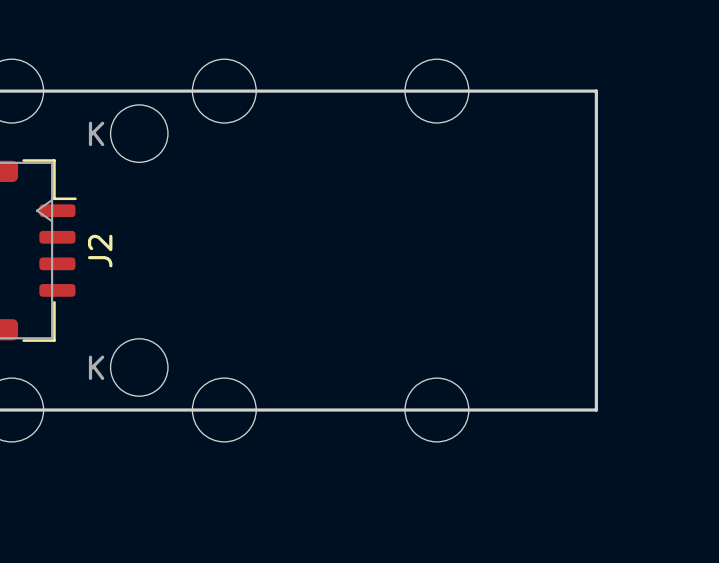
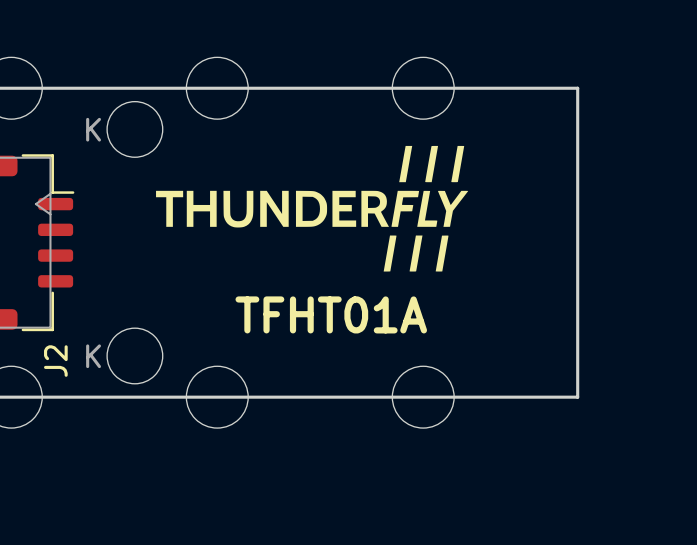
drawing: none -> [156, 145, 469, 272]
J2 name position: J2 (100, 251) -> J2 (55, 361)
text: none -> TFHT01A (331, 314)

